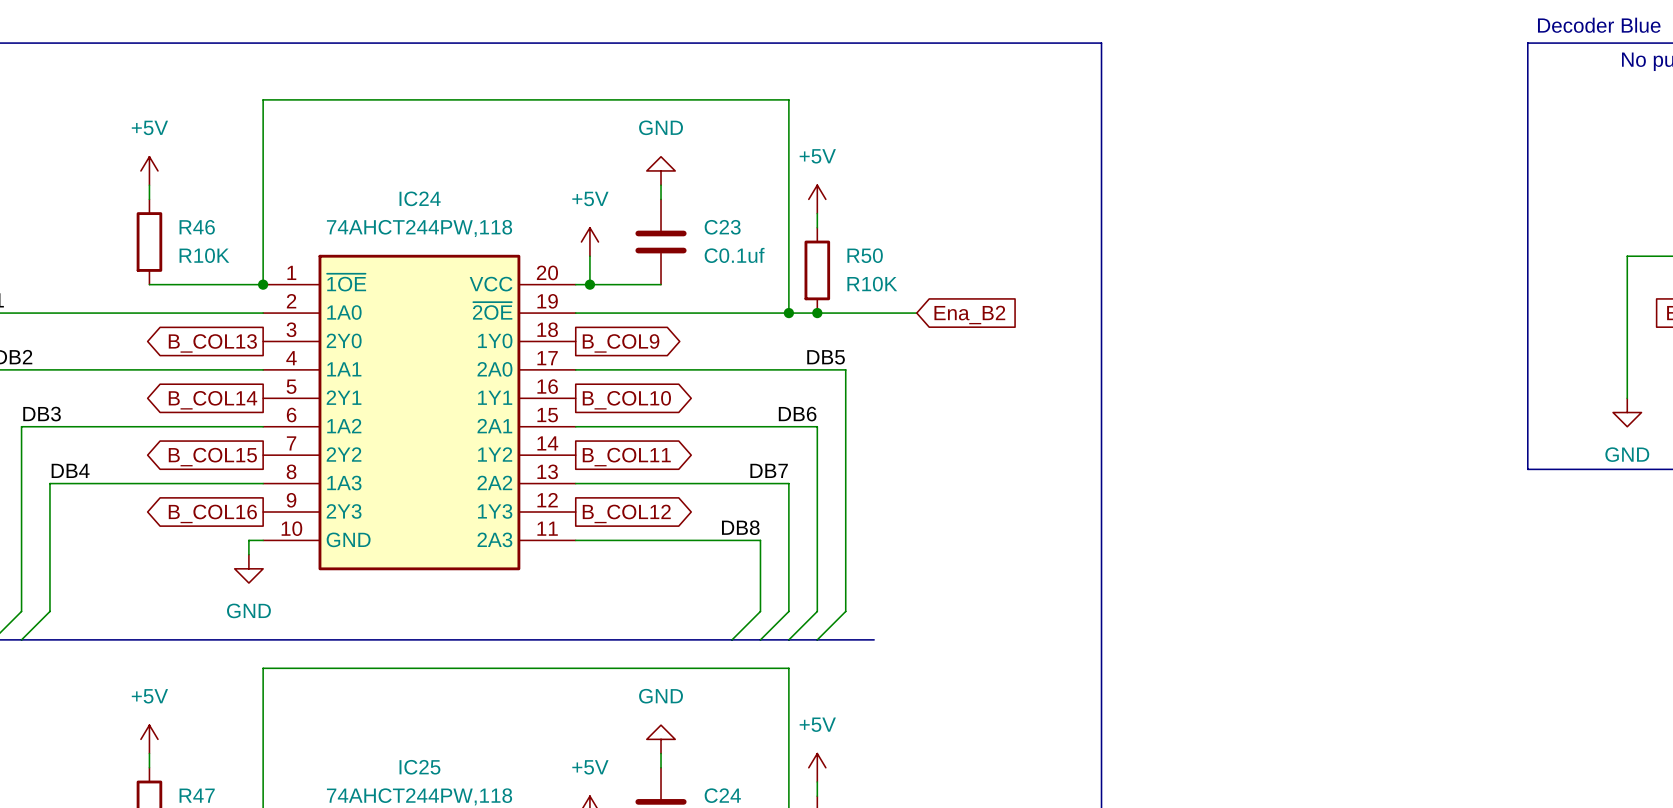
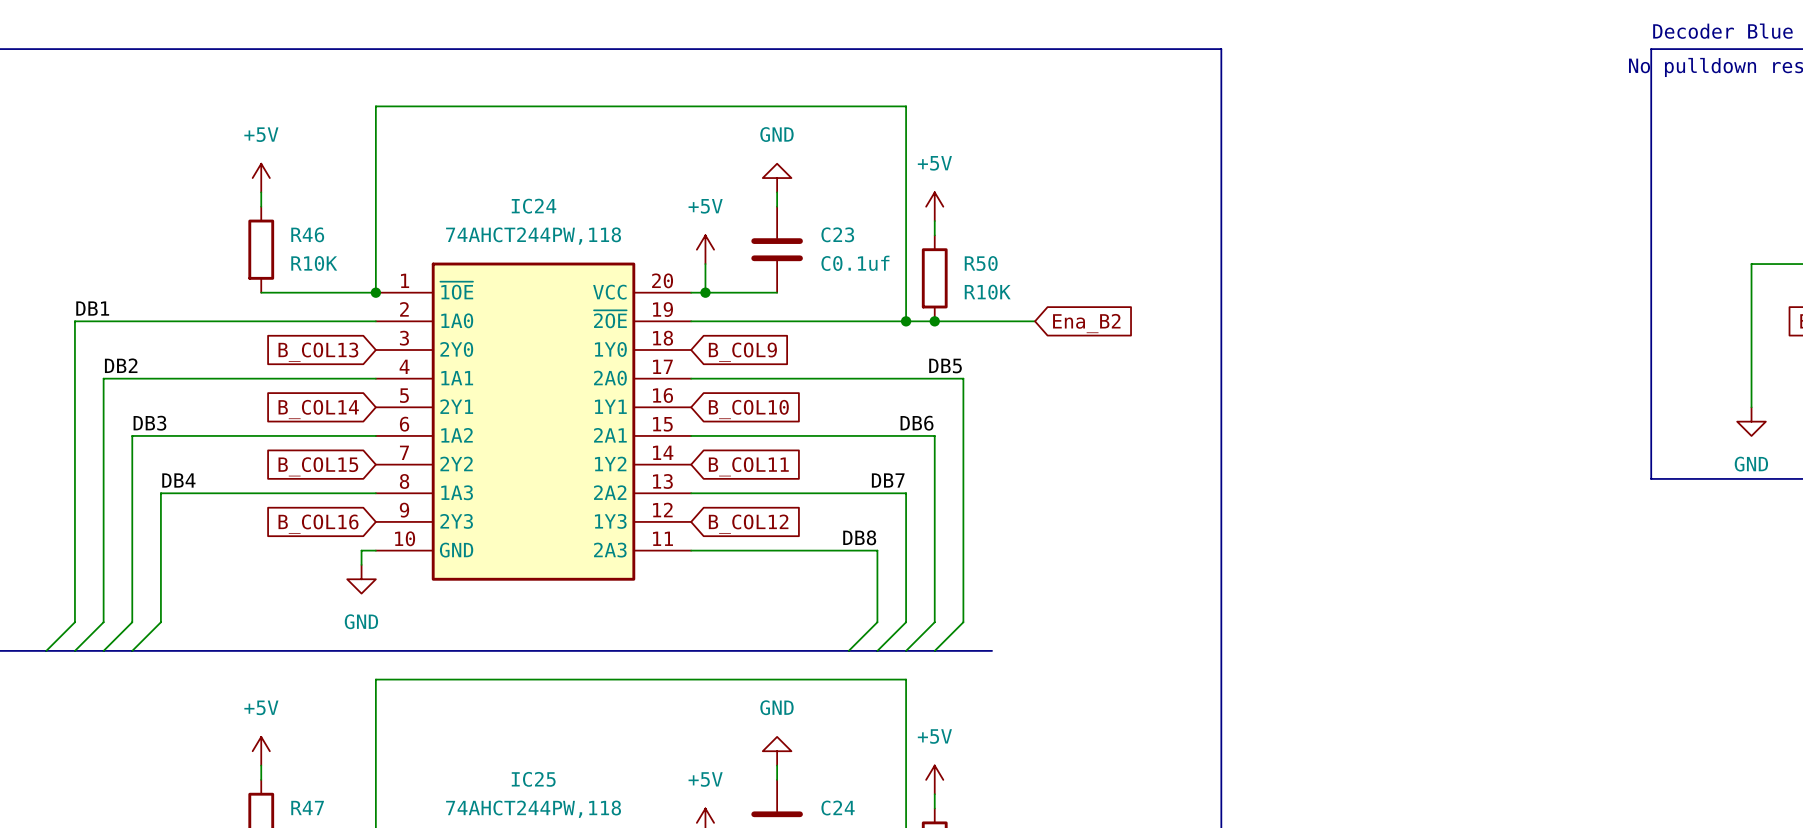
global label shape: output (212, 343) -> input (318, 352)
global label shape: output (621, 343) -> input (742, 352)
global label shape: output (212, 400) -> input (318, 409)
global label shape: output (626, 400) -> input (748, 409)
global label shape: output (212, 457) -> input (318, 466)
global label shape: output (626, 457) -> input (748, 466)
global label shape: output (212, 513) -> input (318, 524)
global label shape: output (626, 513) -> input (748, 524)

